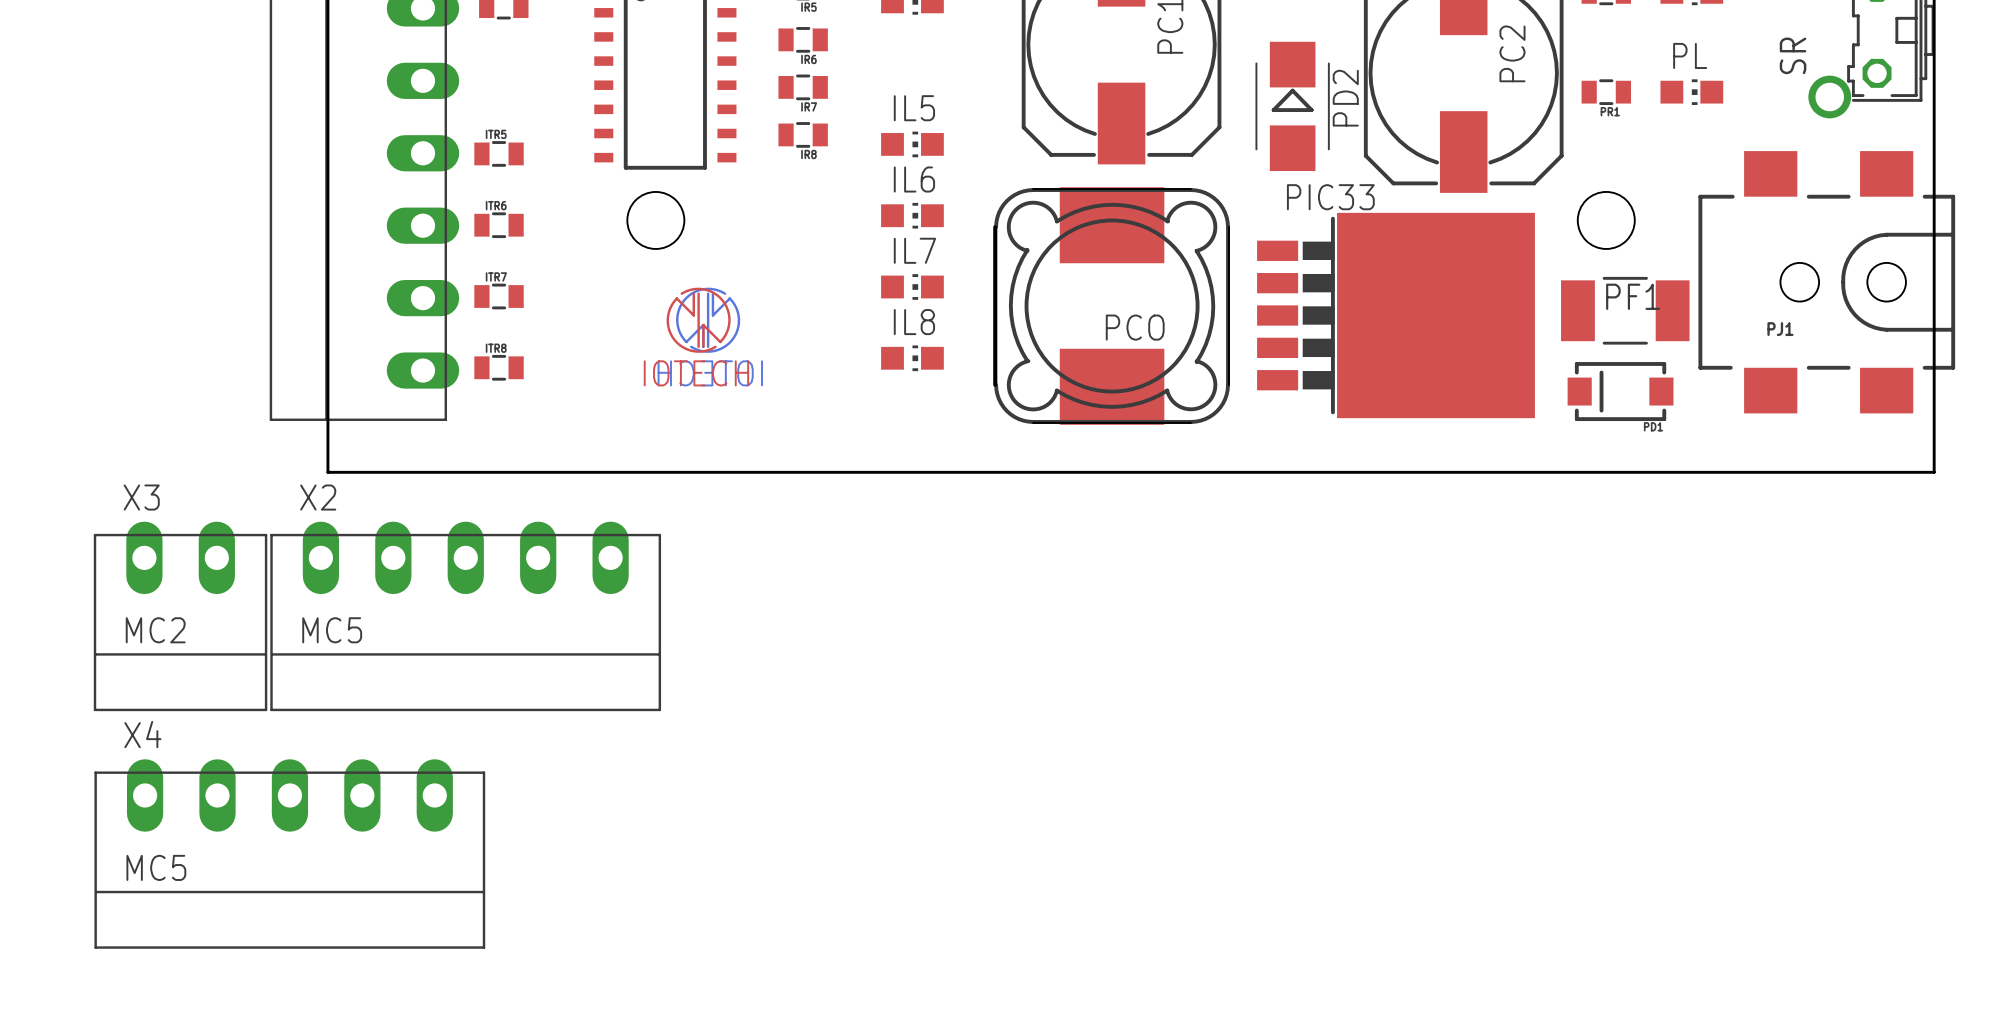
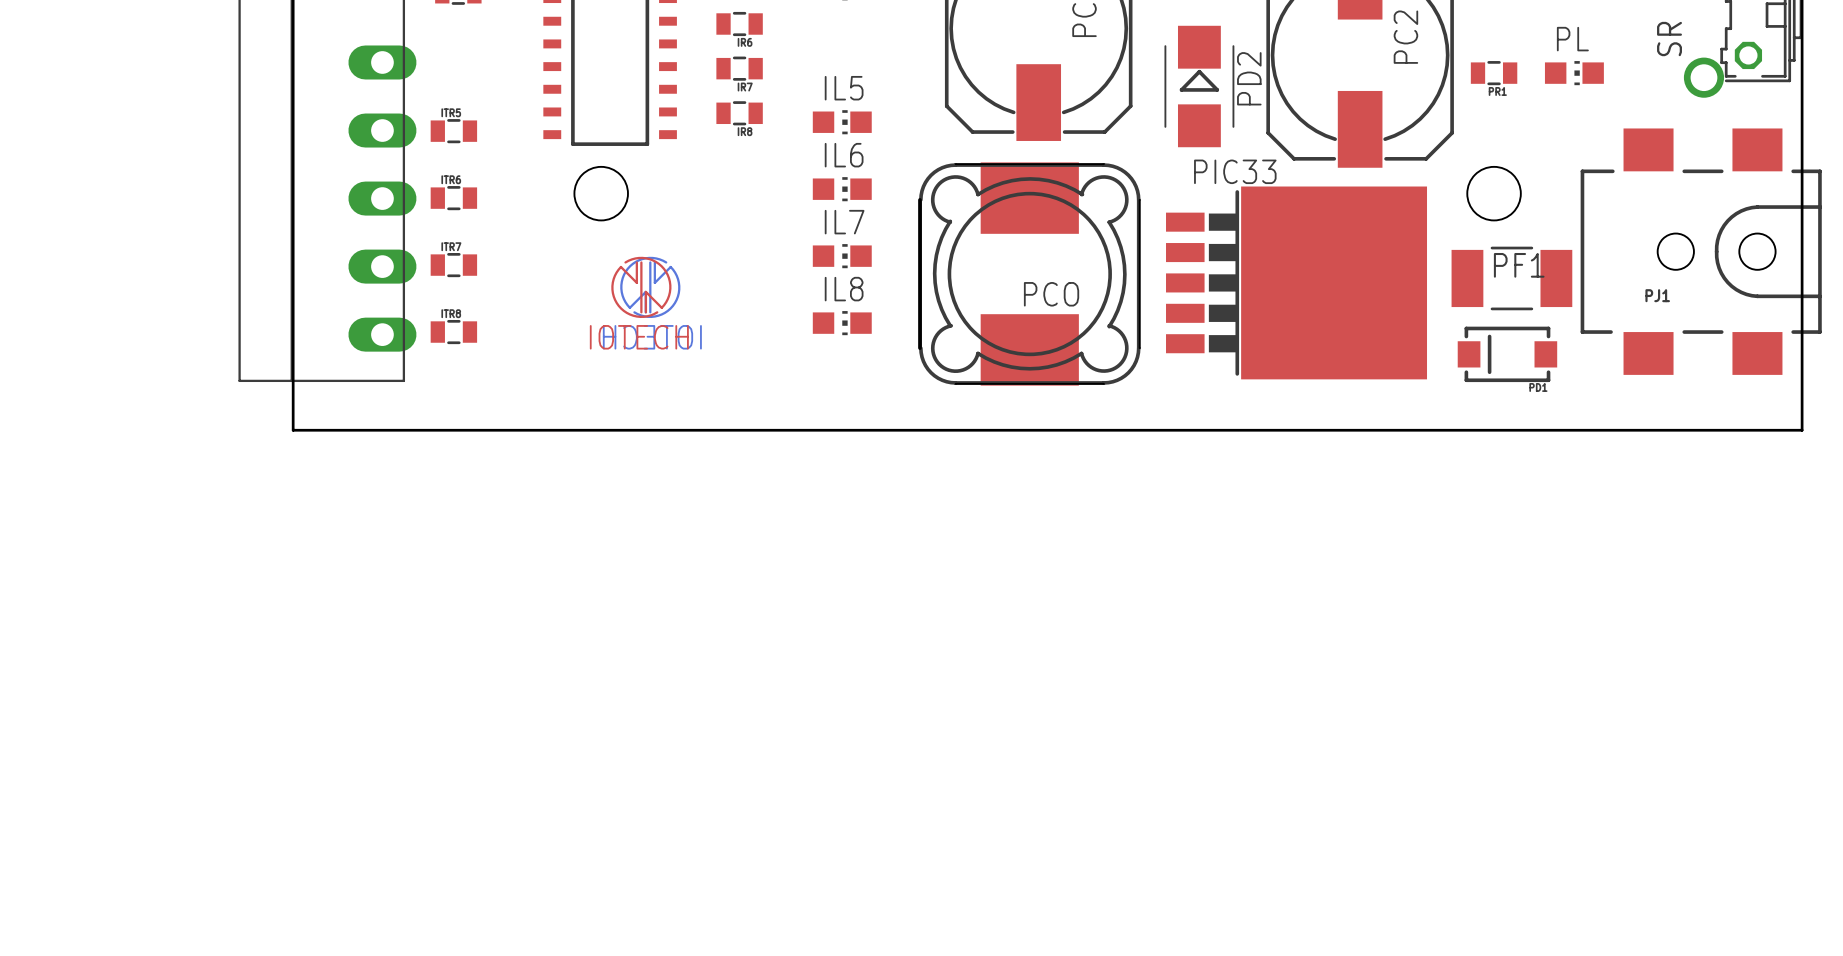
X3: MC2 (180, 616) -> none
X2: MC5 (465, 616) -> none
X4: MC5 (289, 854) -> none

